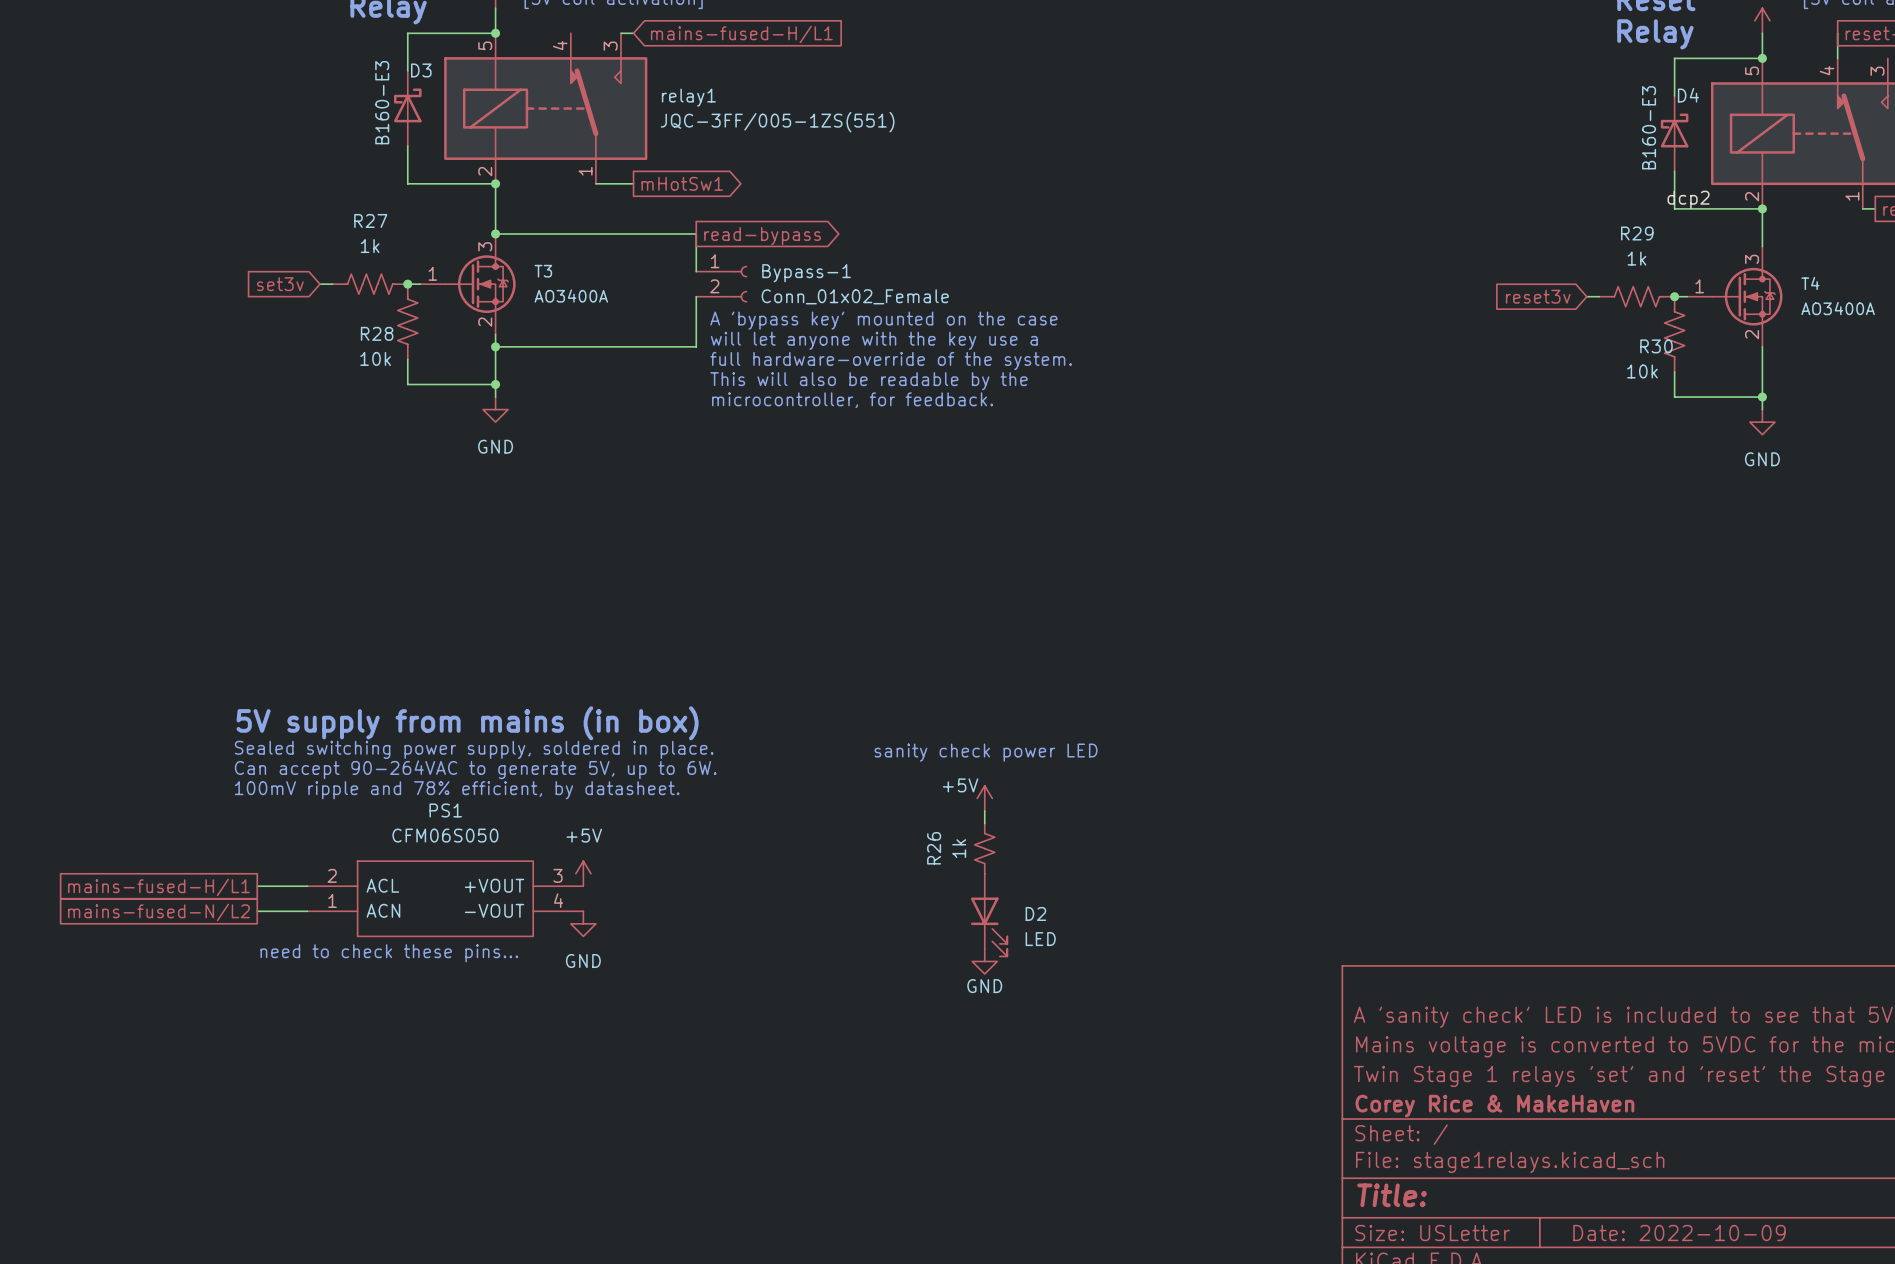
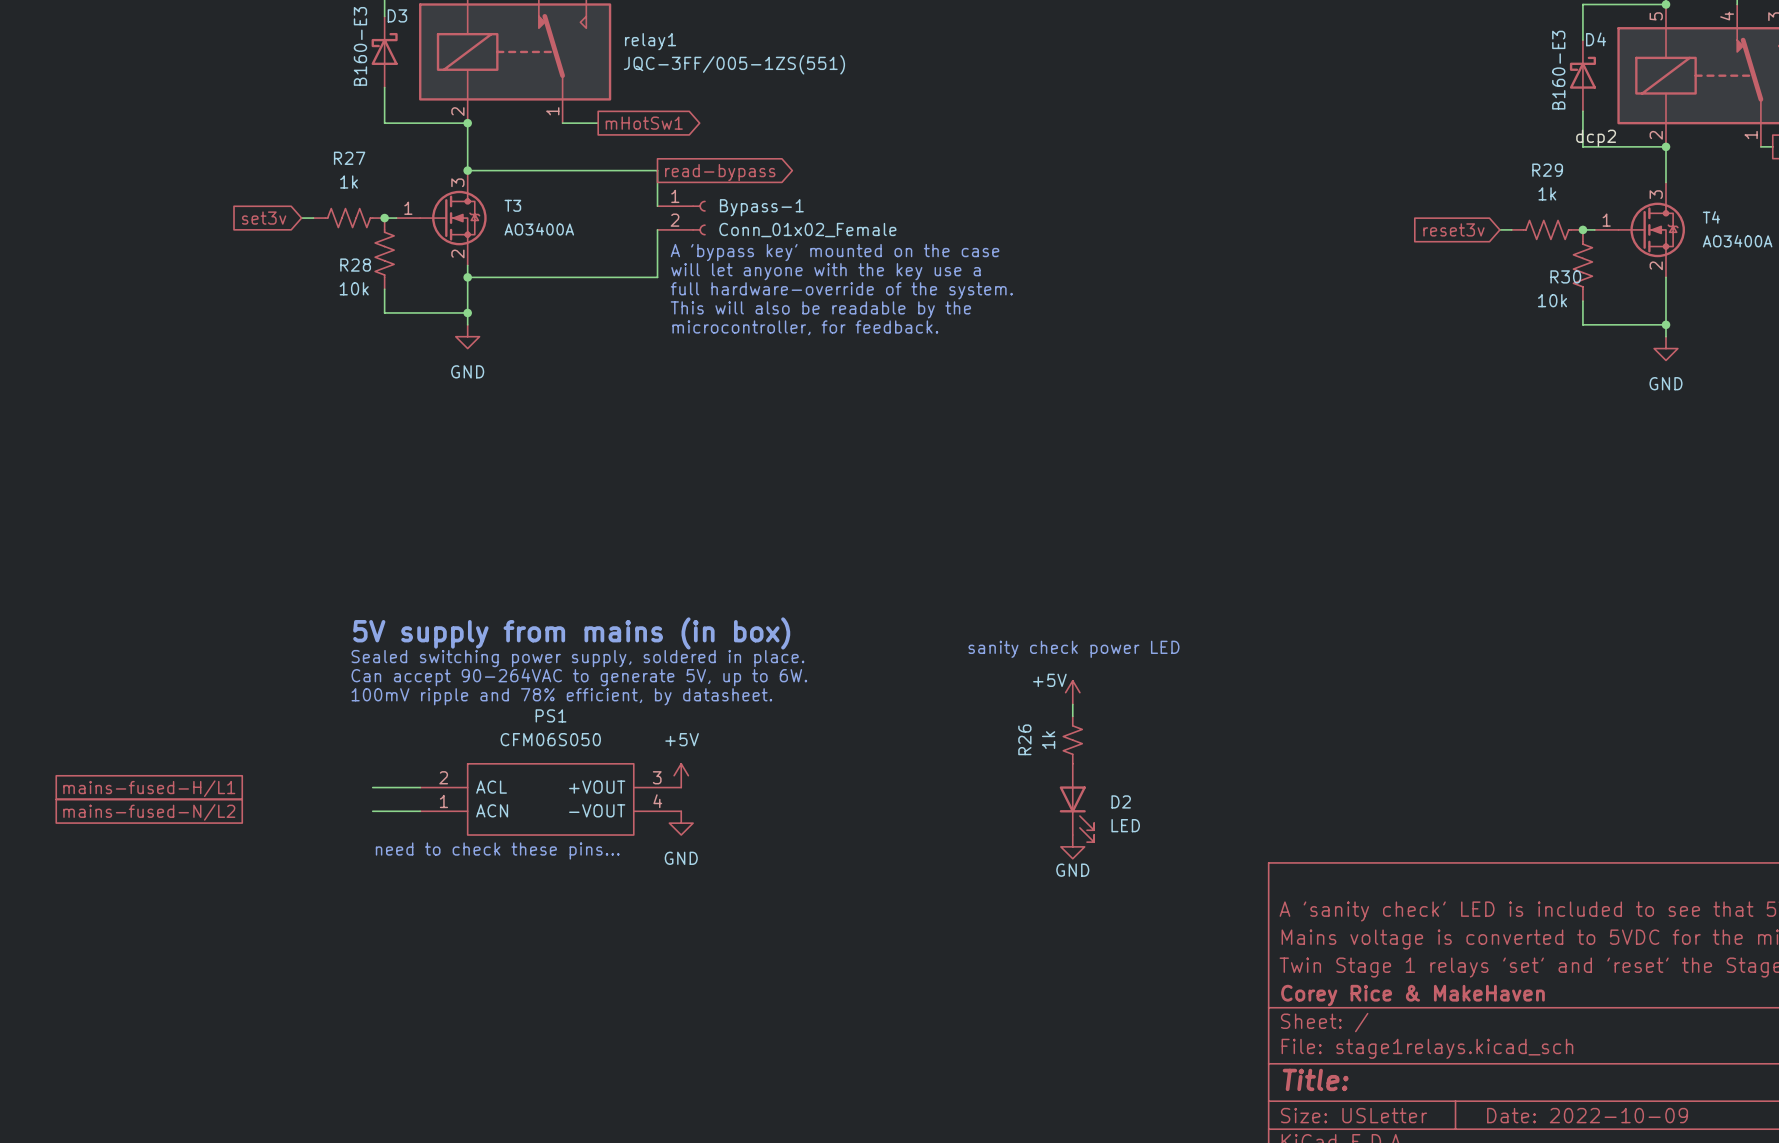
text position: 5V supply from mains (in box) (467, 723) -> 5V supply from mains (in box) (571, 633)
text position: Sealed switching power supply, soldered in place. (474, 749) -> Sealed switching power supply, soldered in place. (577, 658)
text position: sanity check power LED (986, 752) -> sanity check power LED (1073, 649)
text position: Can accept 90-264VAC to generate 5V, up to 6W. (475, 769) -> Can accept 90-264VAC to generate 5V, up to 6W. (579, 677)
power symbol: none -> +5V (1072, 692)
text position: 100mV ripple and 78% efficient, by datasheet. (457, 790) -> 100mV ripple and 78% efficient, by datasheet. (561, 696)
power symbol: +5V (984, 798) -> none
wire: (984, 810) (984, 823) -> (1072, 704) (1072, 716)
R26 position: (984, 848) -> (1072, 740)
power symbol: +5V (583, 873) -> none
power symbol: none -> +5V (681, 775)
wire: (257, 886) (307, 886) -> (372, 787) (420, 787)
PS1 position: (445, 898) -> (550, 799)
wire: (257, 911) (307, 911) -> (372, 811) (420, 811)
D2 position: (989, 915) -> (1076, 802)
power symbol: GND (583, 923) -> none
power symbol: none -> GND (681, 823)
power symbol: none -> GND (1072, 846)
text position: need to check these pins... (389, 953) -> need to check these pins... (497, 851)
power symbol: GND (984, 961) -> none

